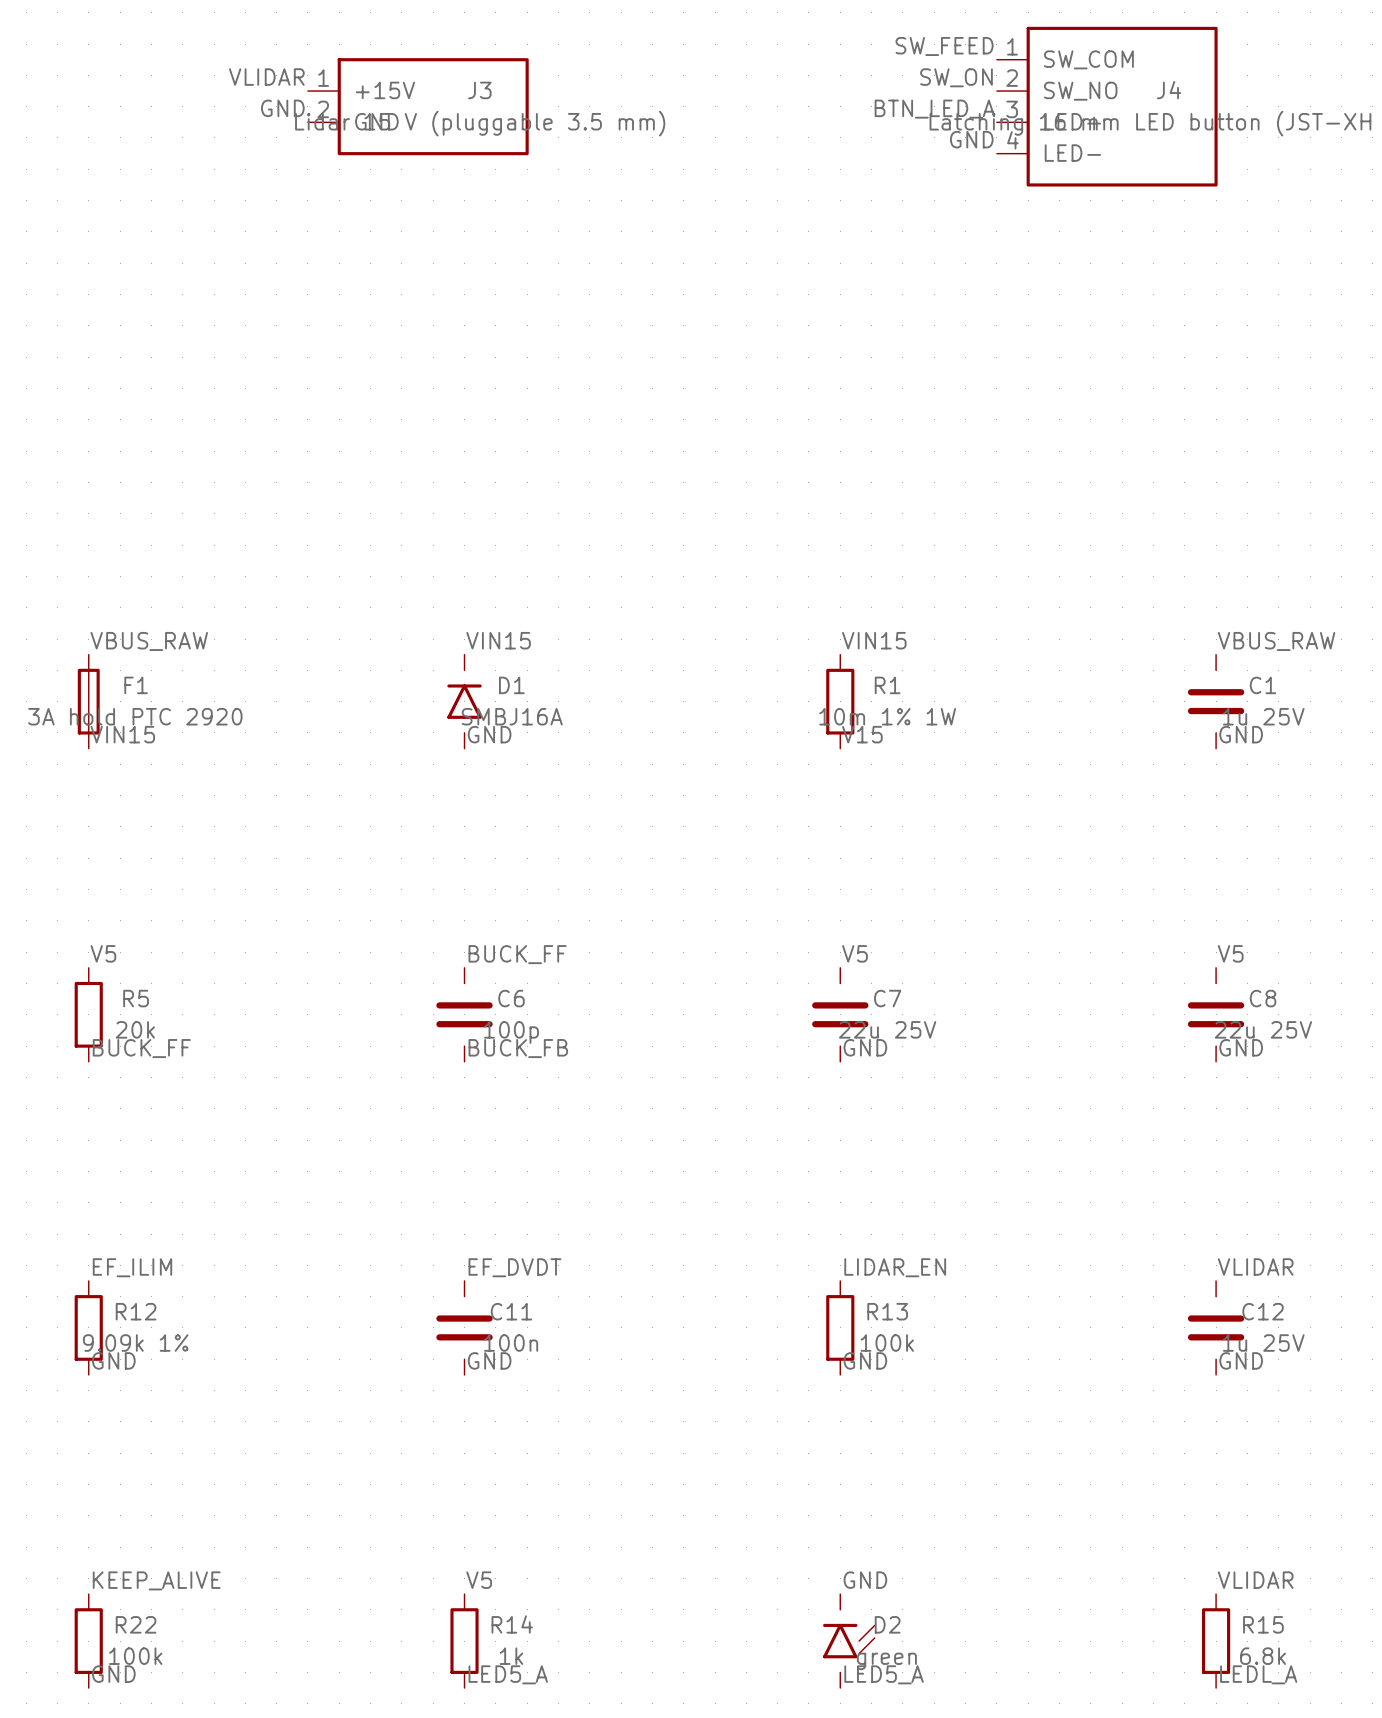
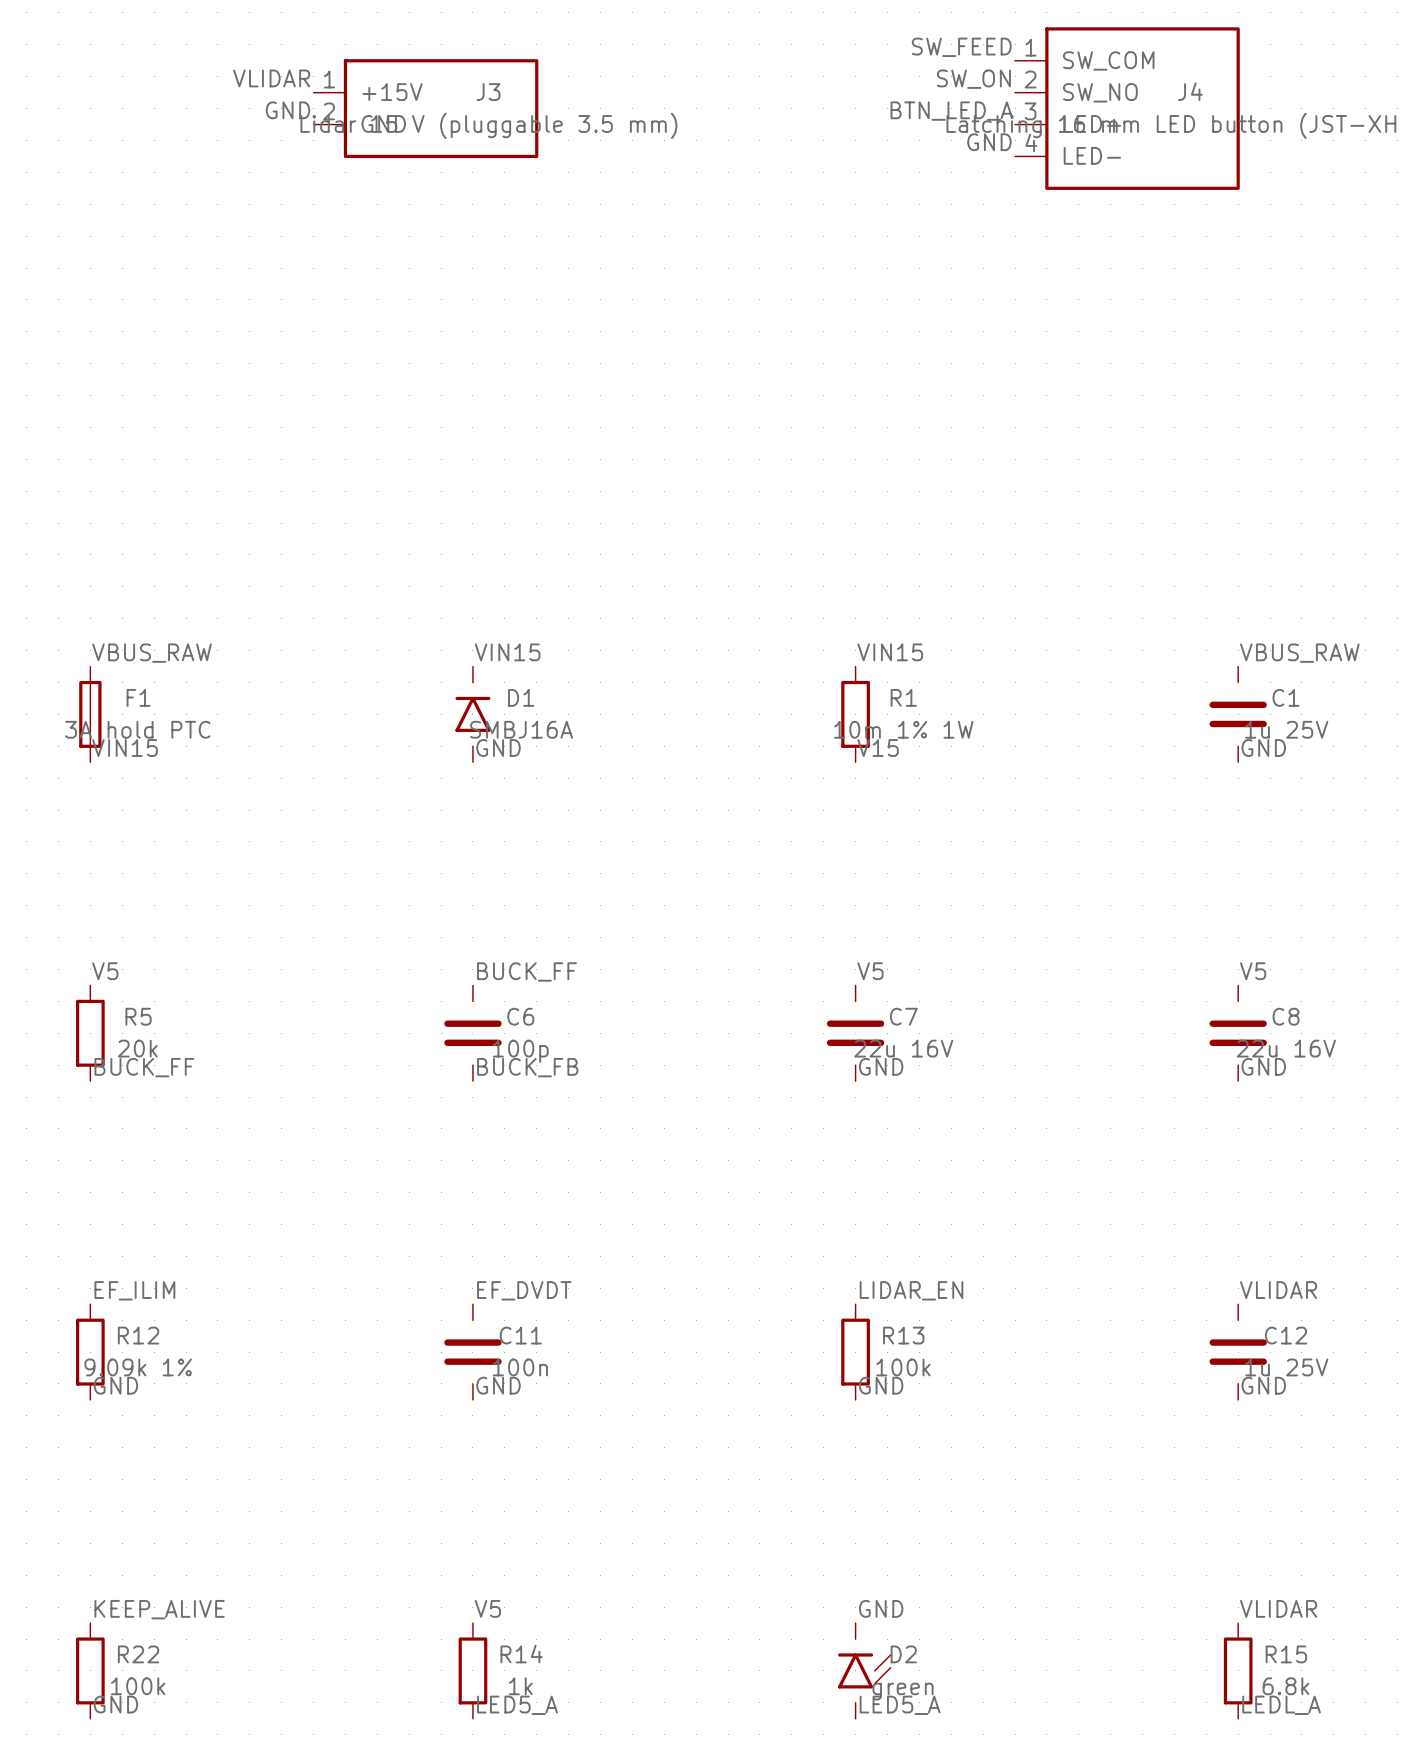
F1 value: 3A hold PTC 2920 (135, 716) -> 3A hold PTC (137, 729)
C7 value: 22u 25V (887, 1029) -> 22u 16V (903, 1048)
C8 value: 22u 25V (1263, 1029) -> 22u 16V (1286, 1048)

